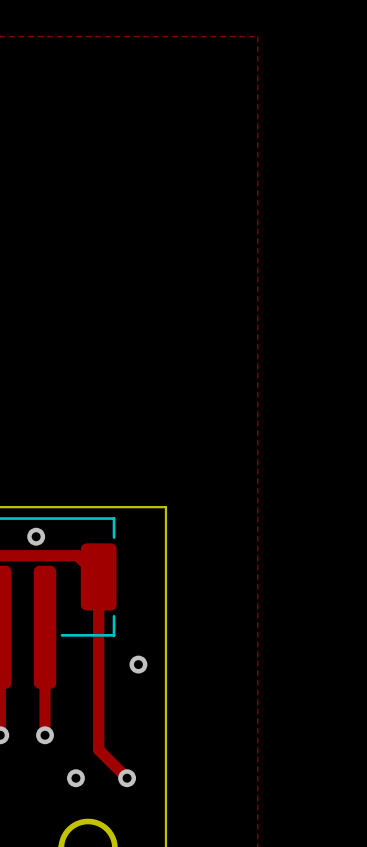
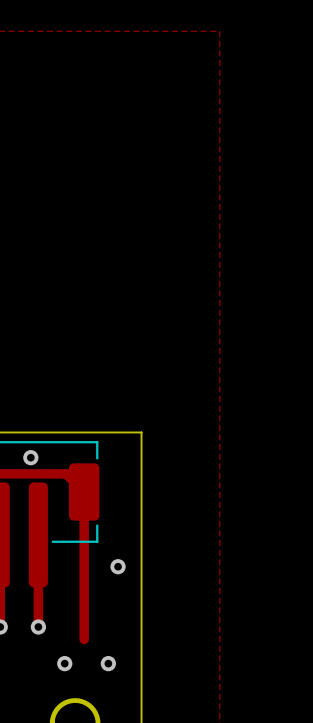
track: (98, 749) (127, 778) -> none

